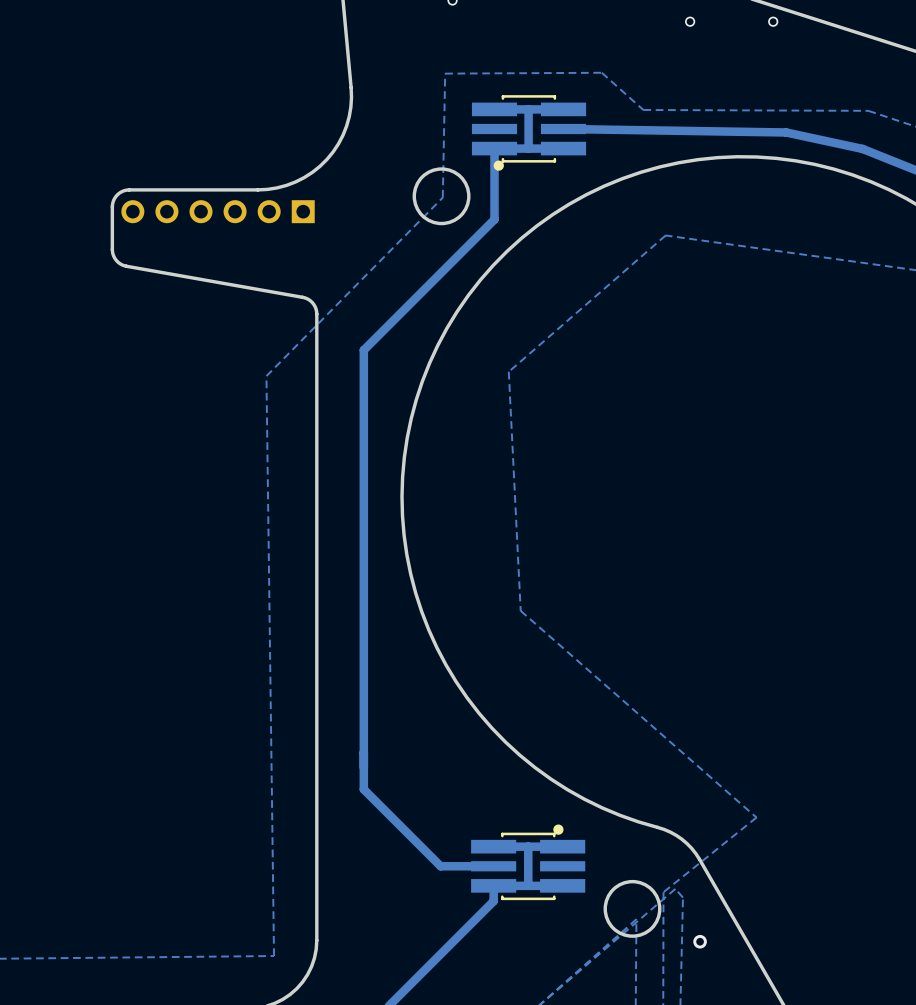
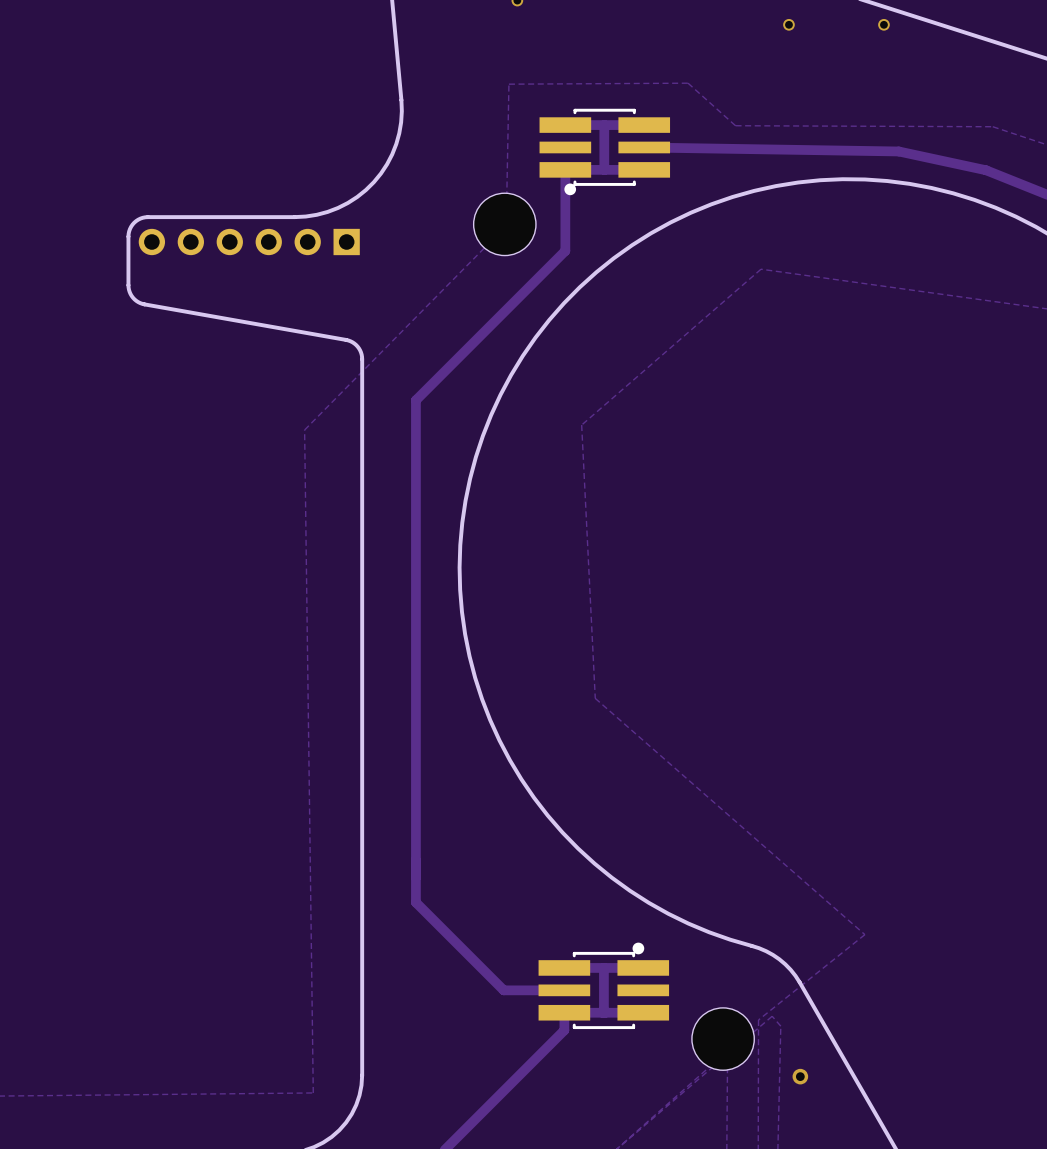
round board edge: [412, 167, 471, 226] -> none
part: none -> (504, 224)
round board edge: [603, 879, 662, 938] -> none
part: none -> (723, 1039)

